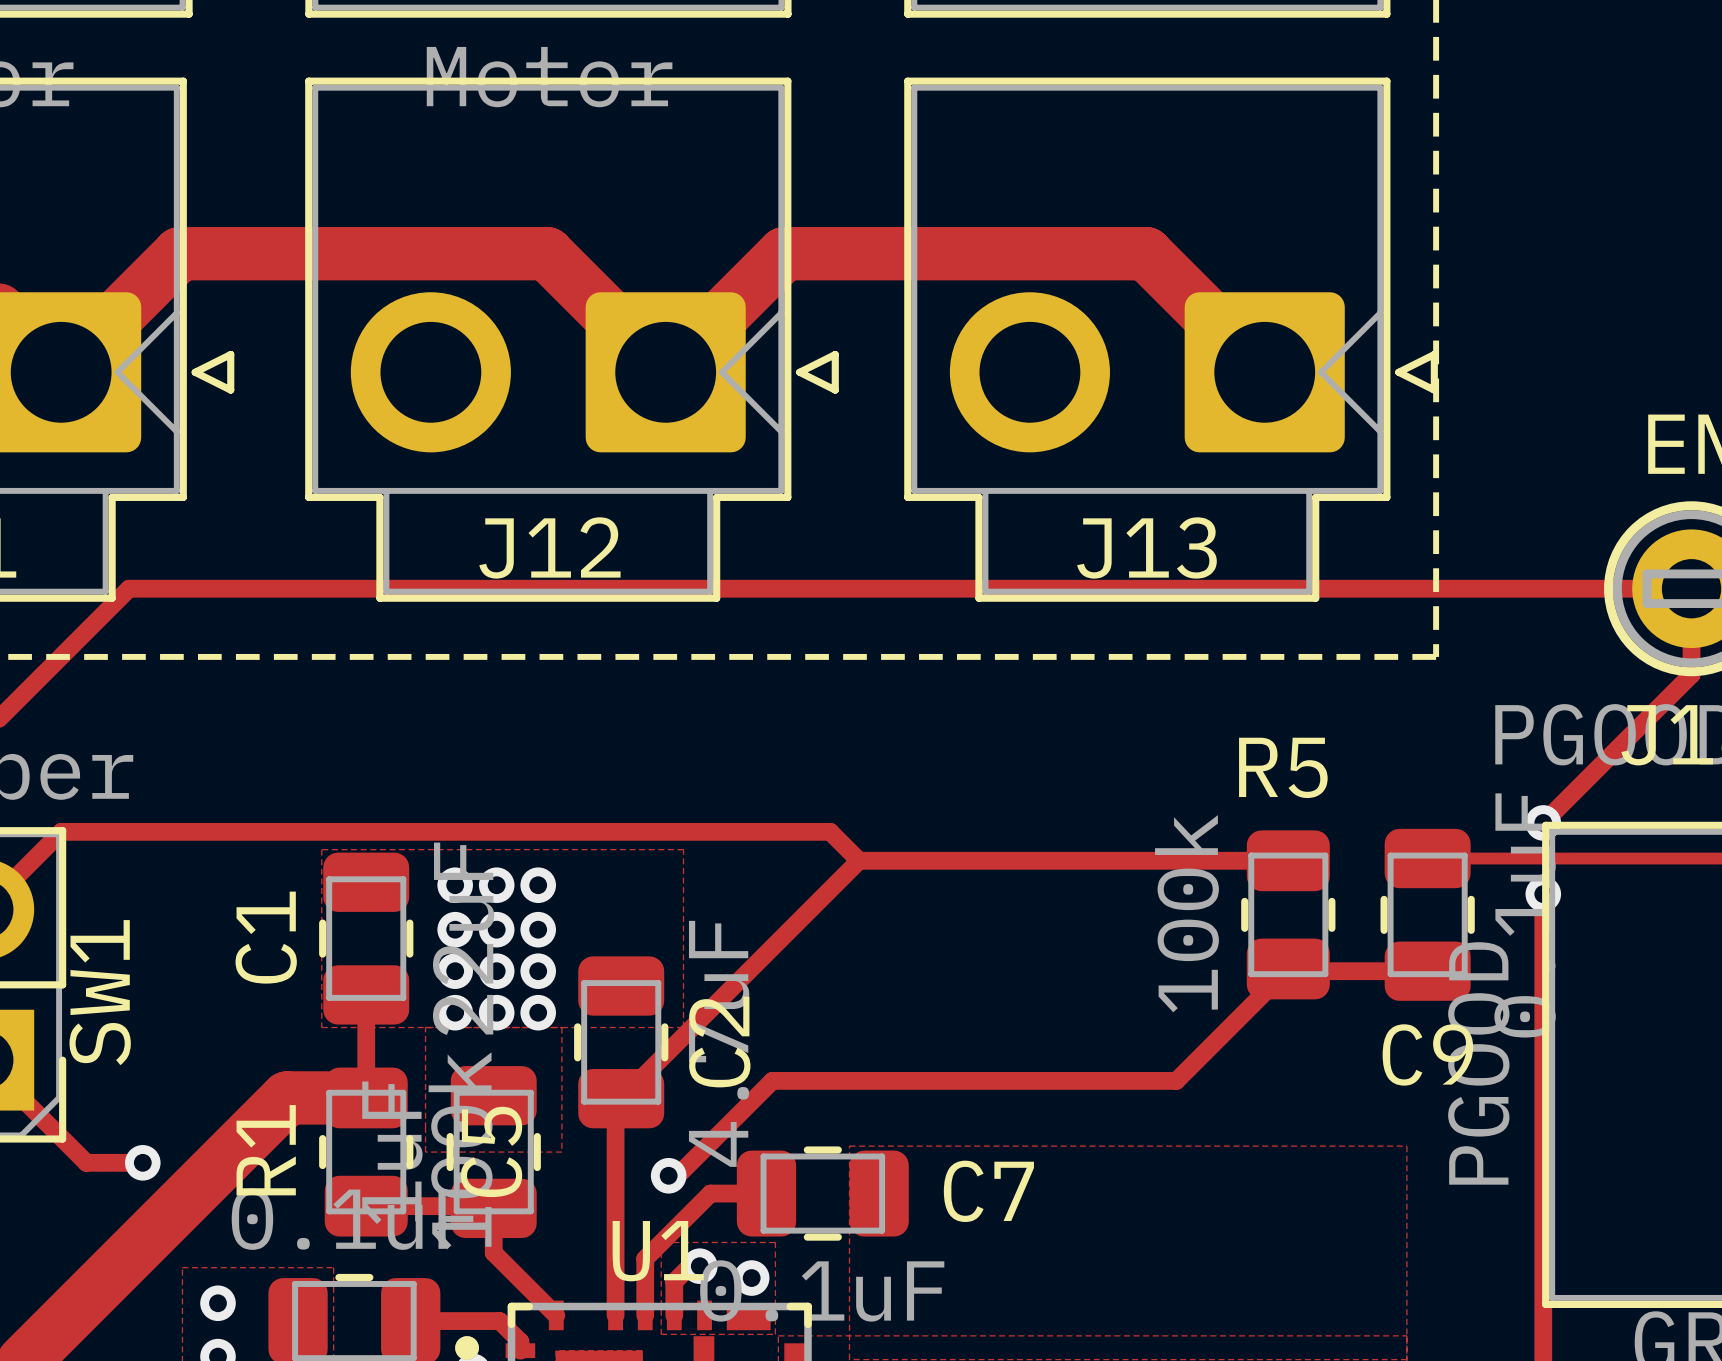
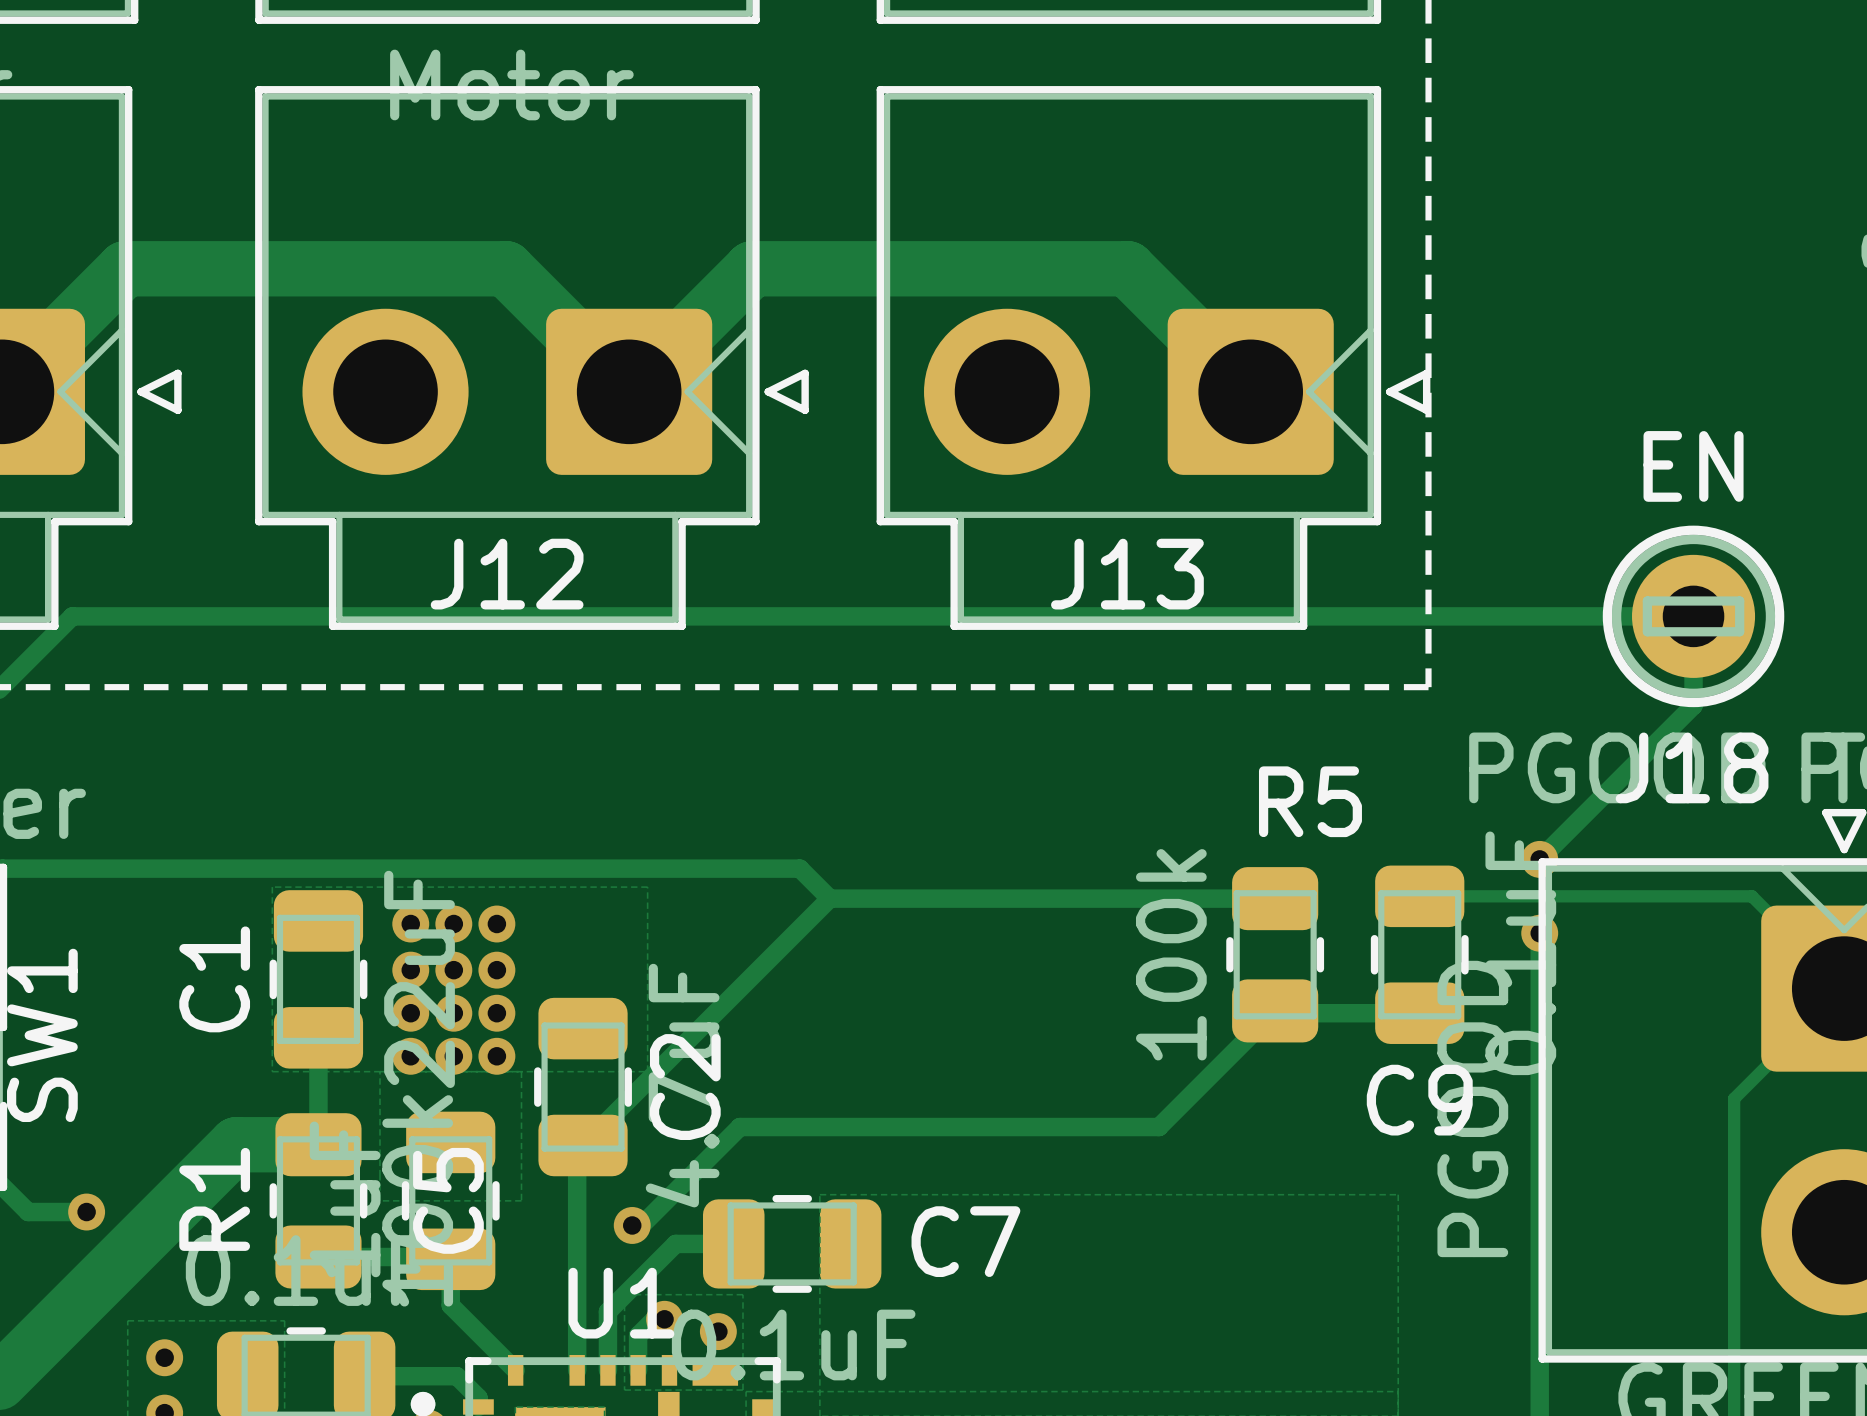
R5 name position: R5 (1283, 767) -> R5 (1310, 801)

